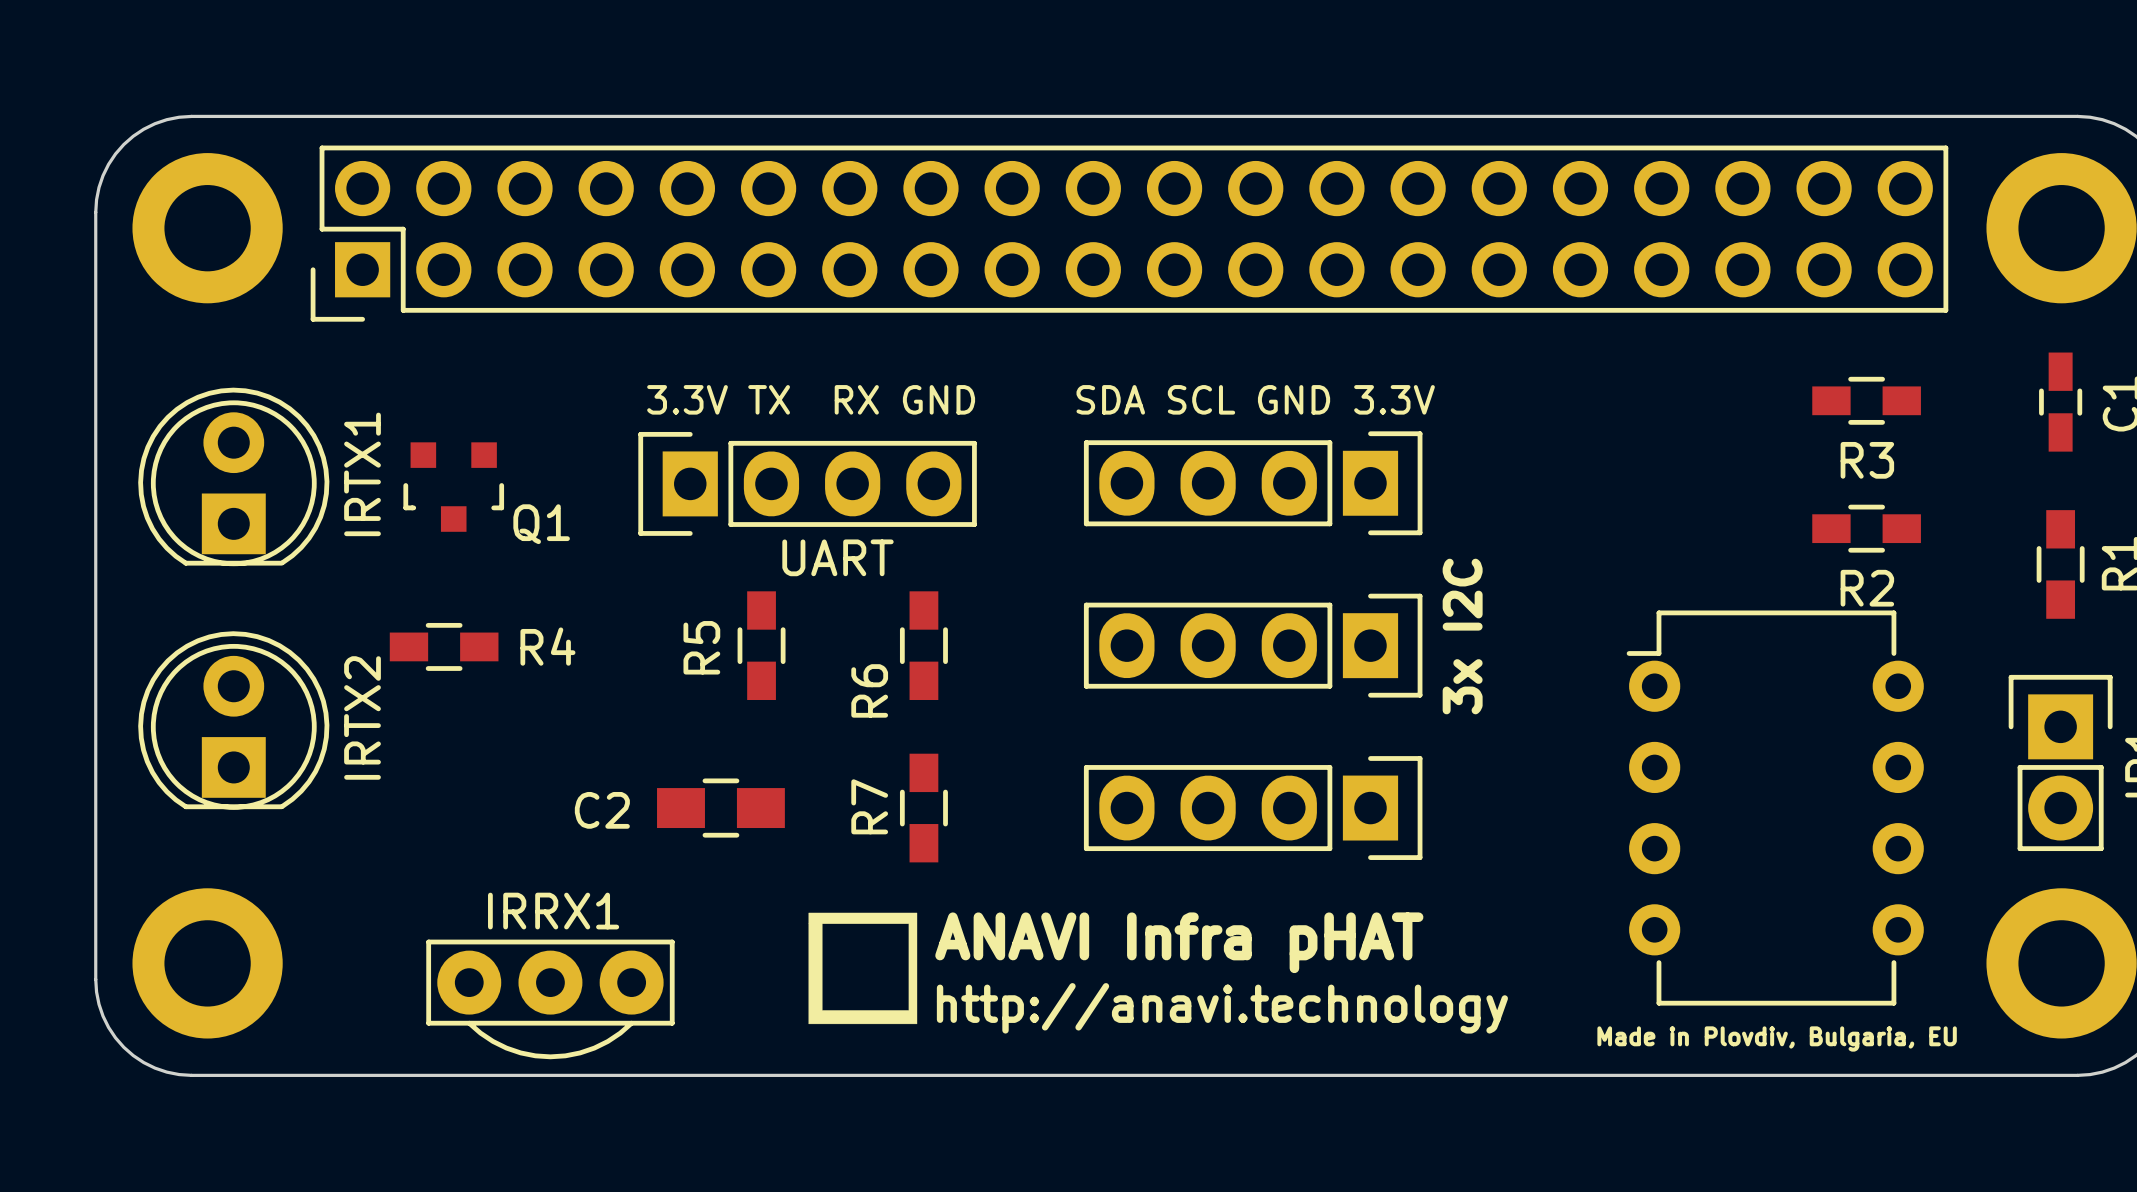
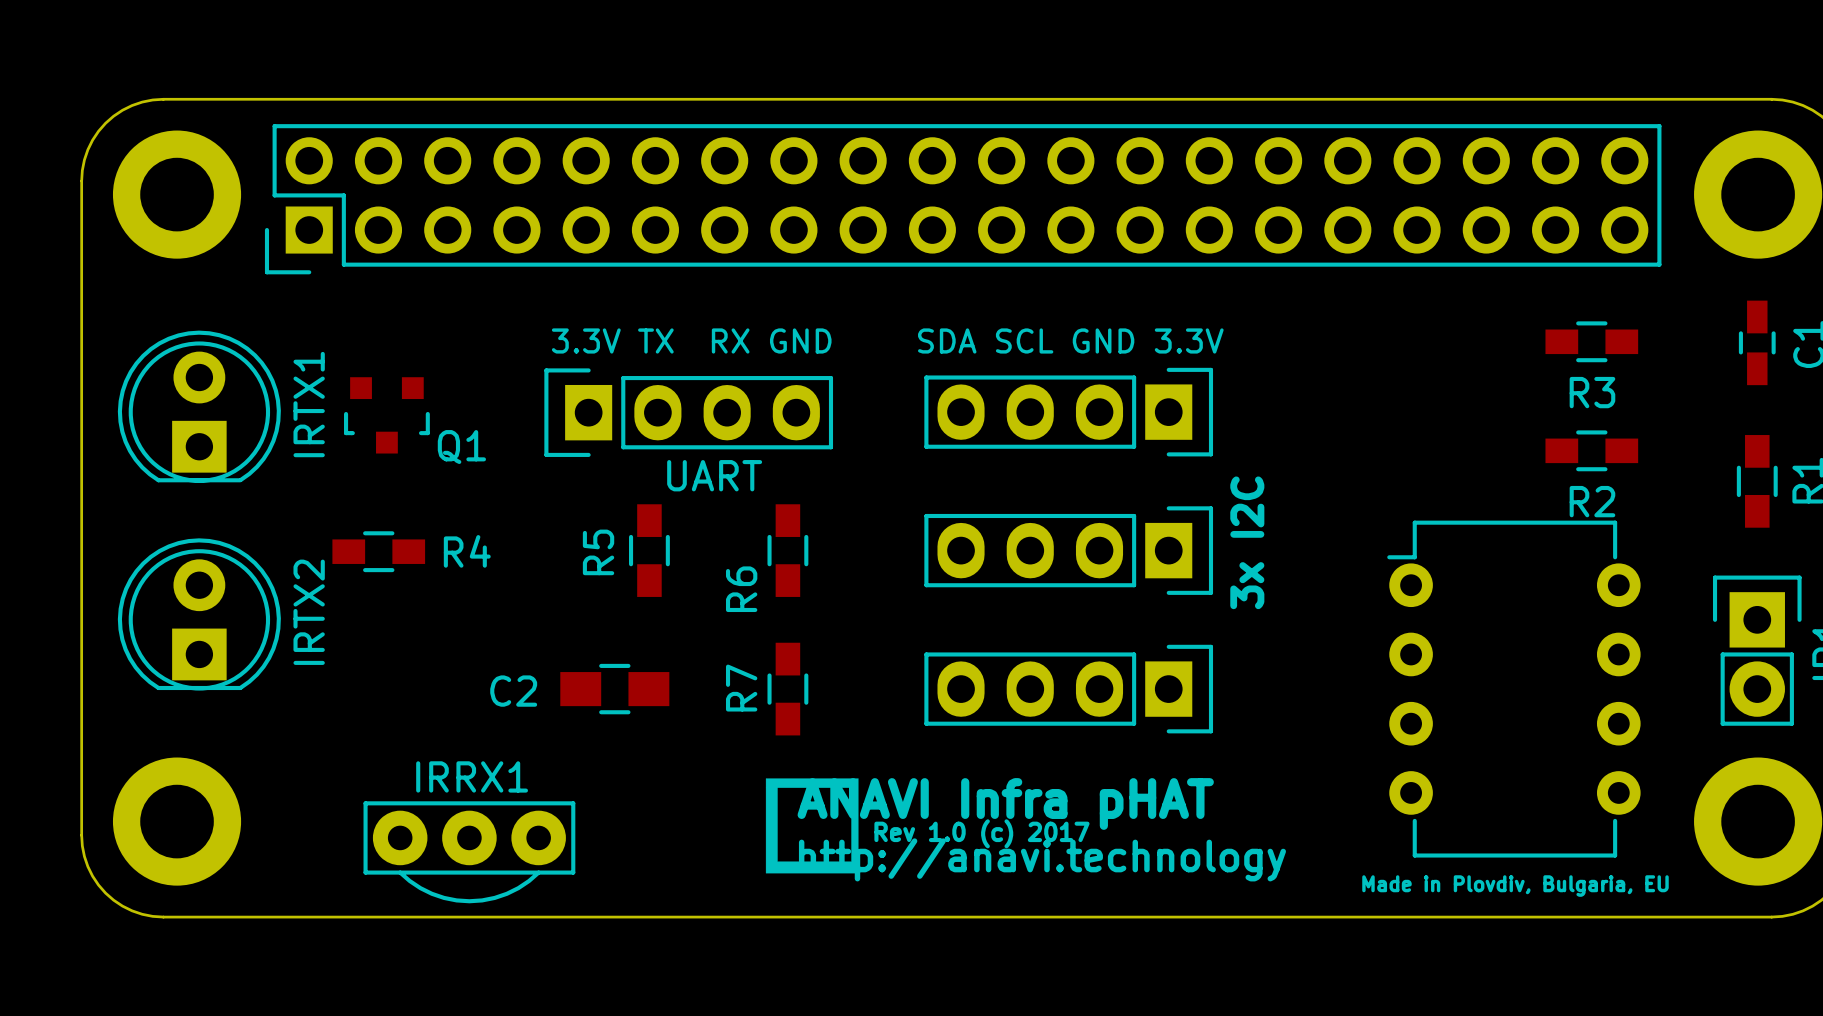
drawing position: (862, 968) -> (812, 825)
text: none -> Rev 1.0 (c) 2017 (981, 833)

